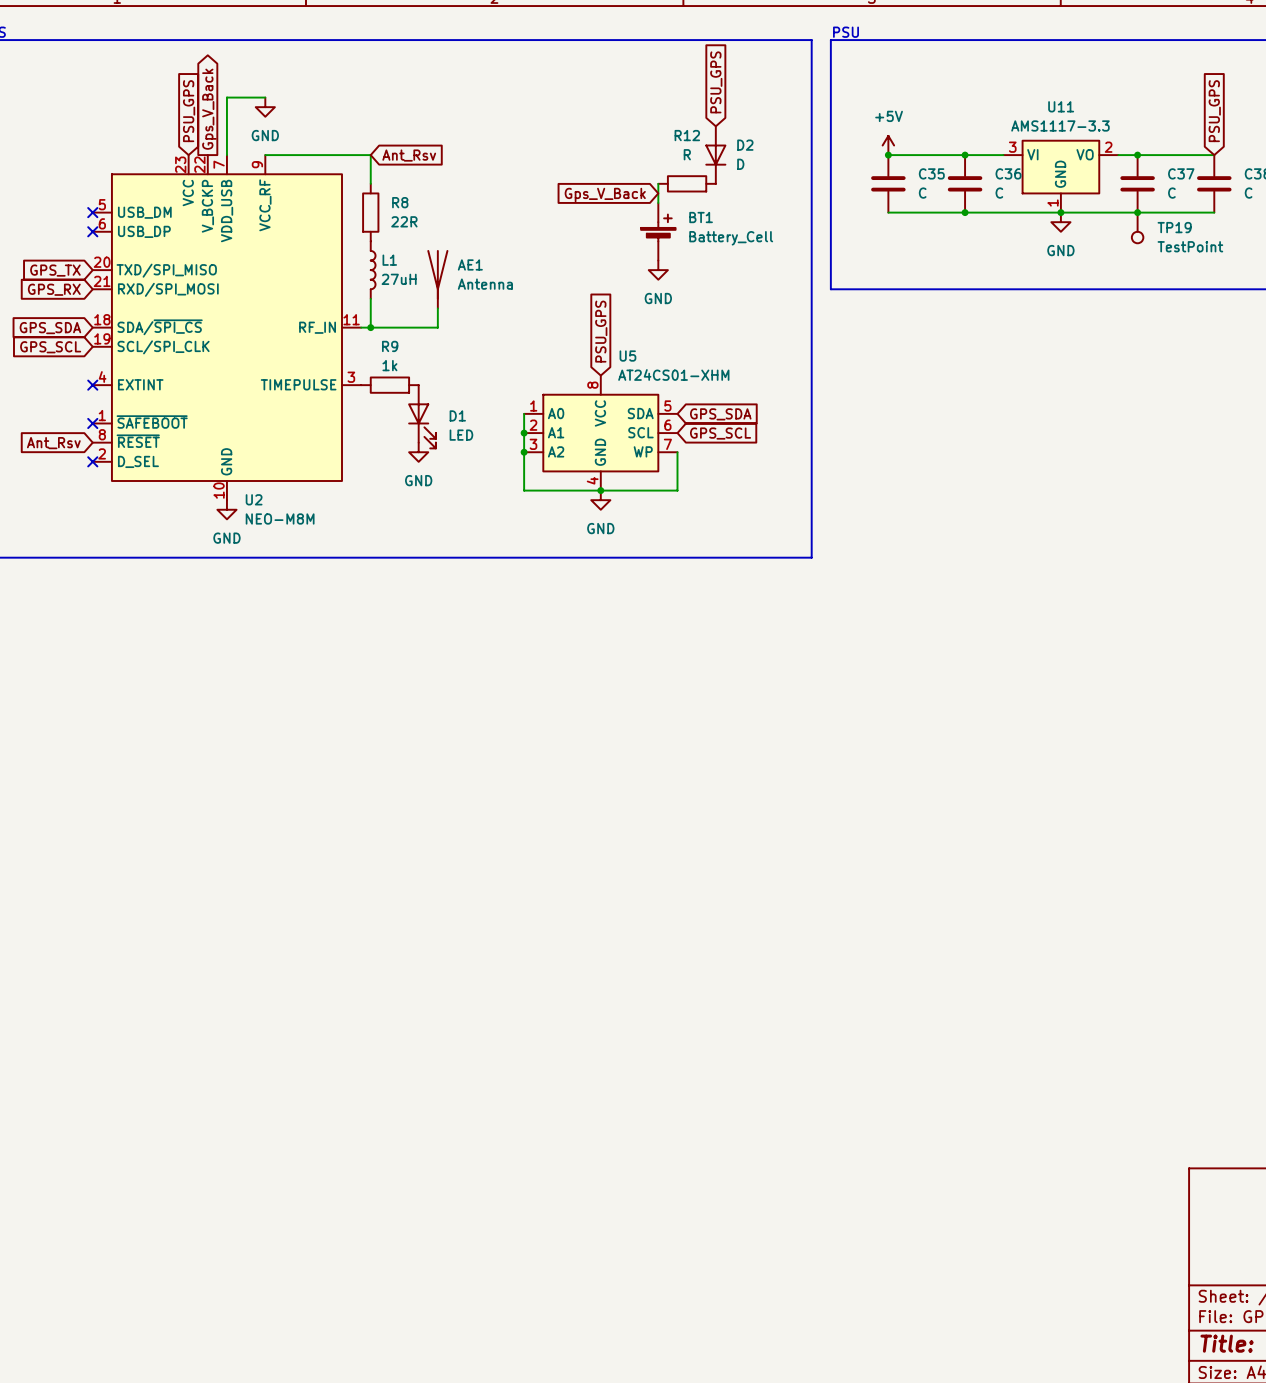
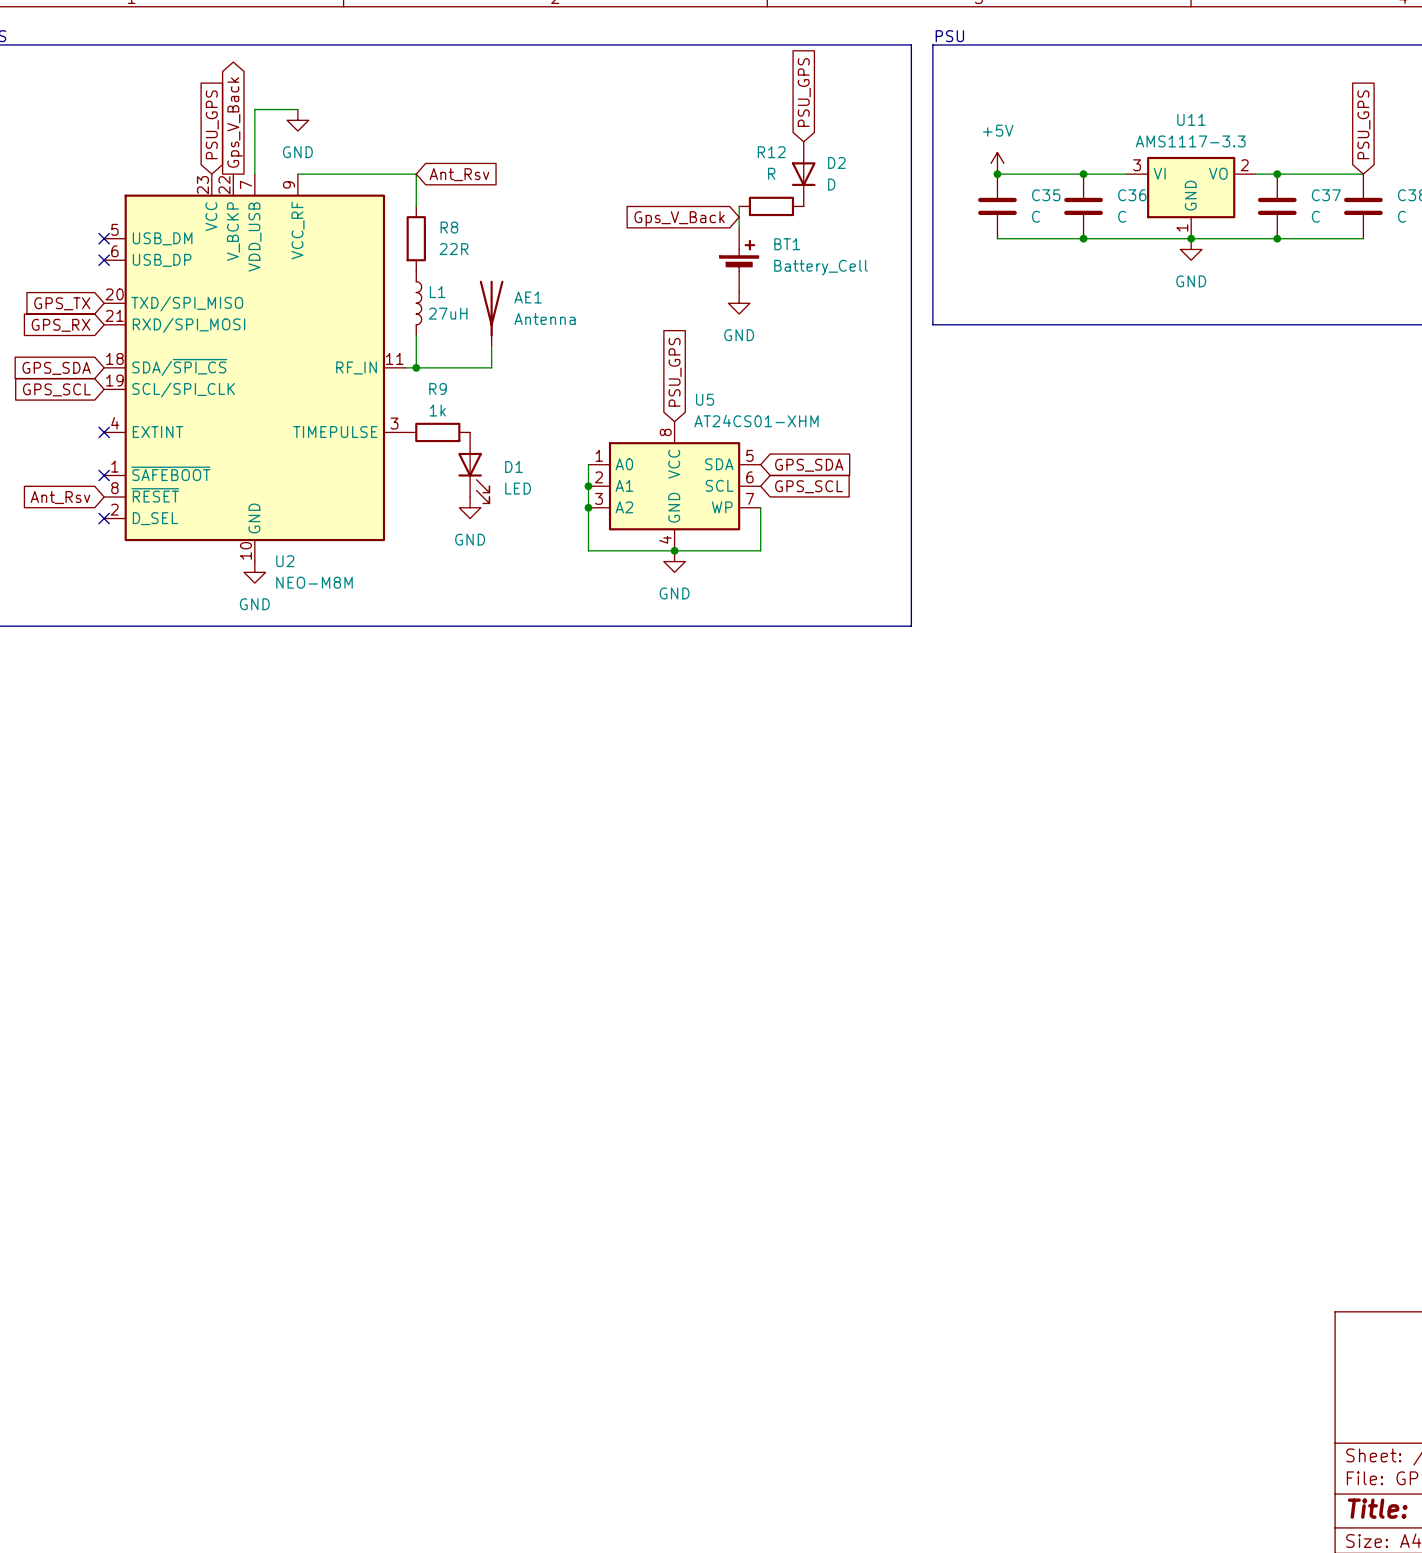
TP19: TestPoint (1137, 227) -> none

